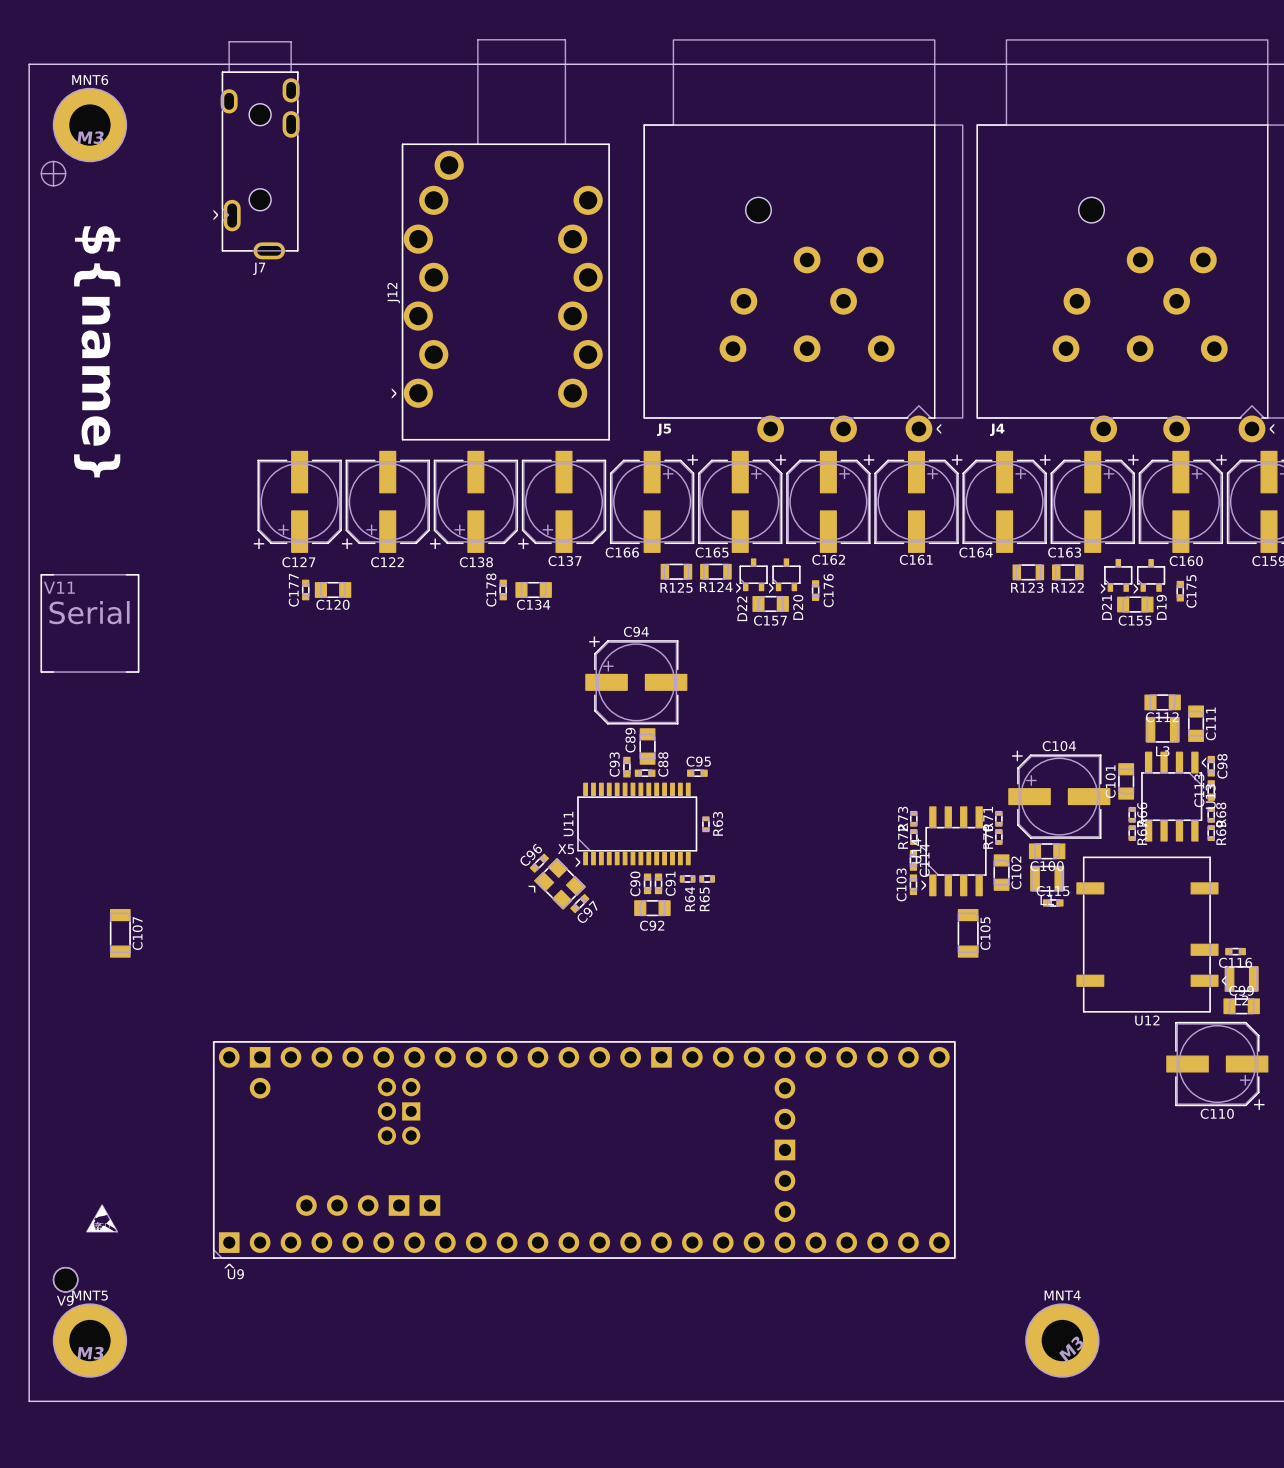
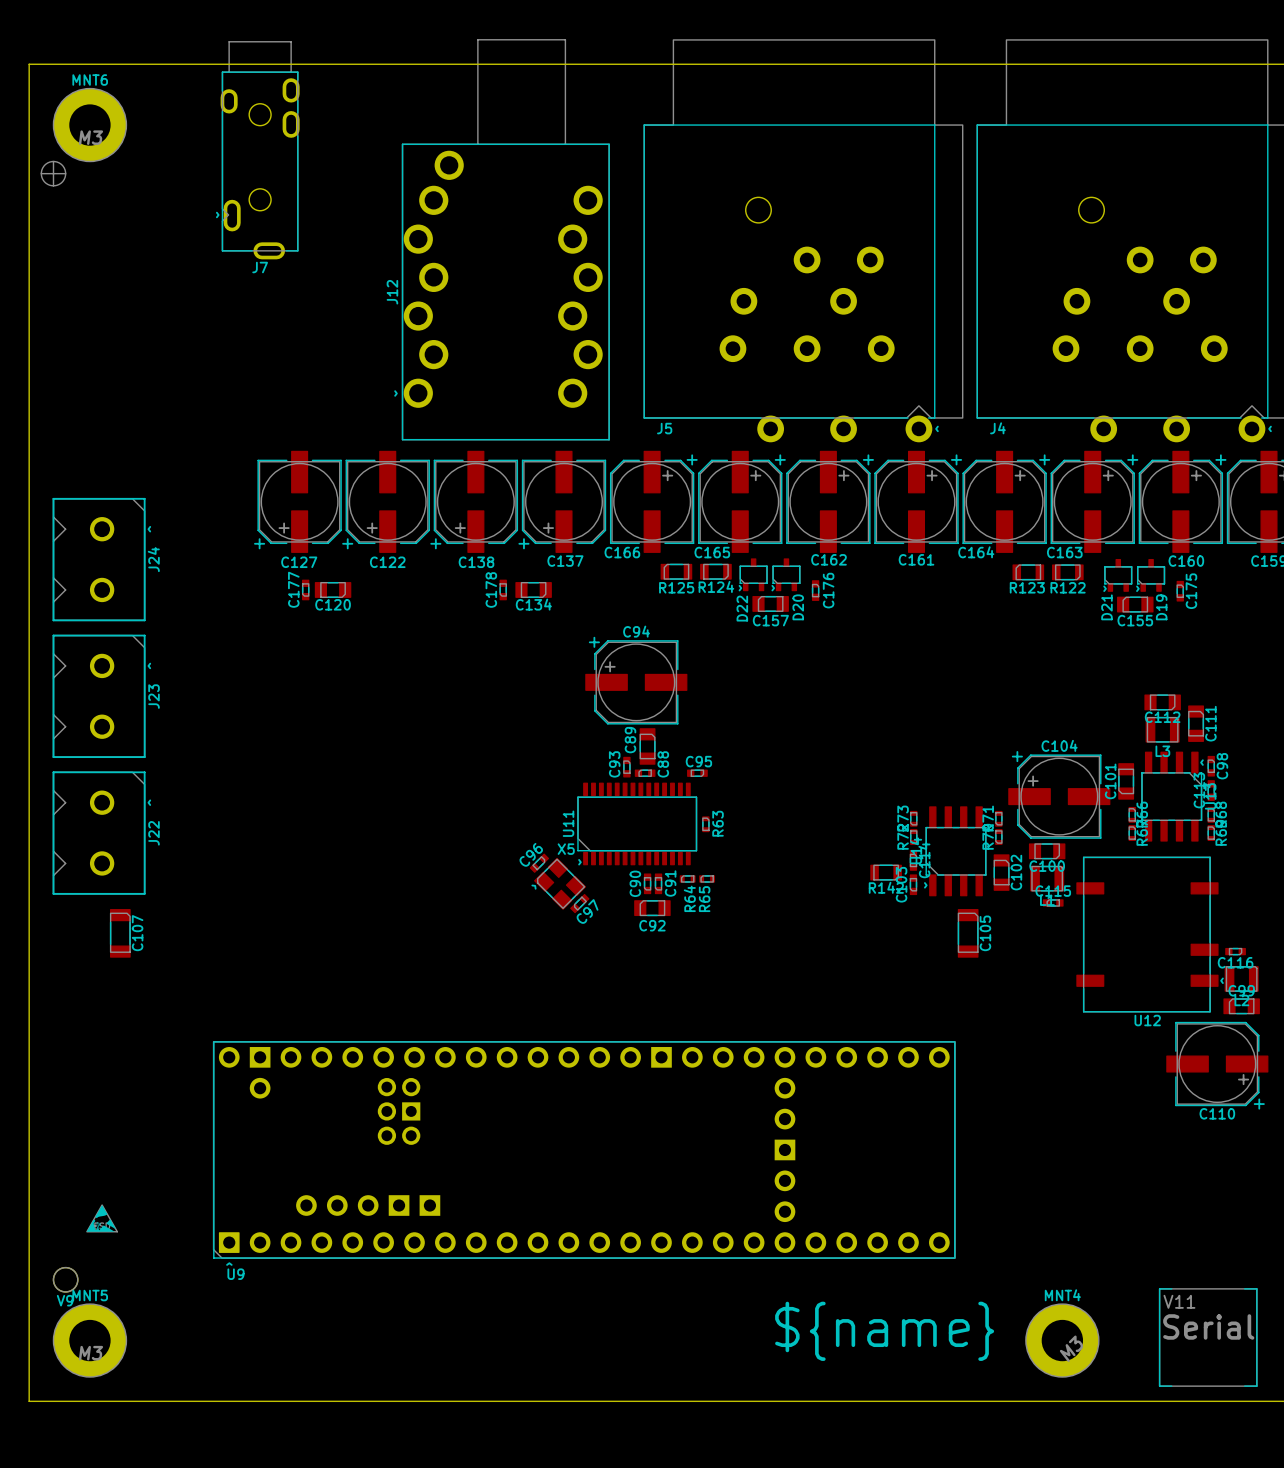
text: ${name} (97, 351) -> none
J24: none -> (99, 559)
V11 position: (89, 623) -> (1208, 1337)
J23: none -> (99, 696)
J22: none -> (99, 833)
R142: none -> (886, 872)
text: none -> ${name} (884, 1331)

